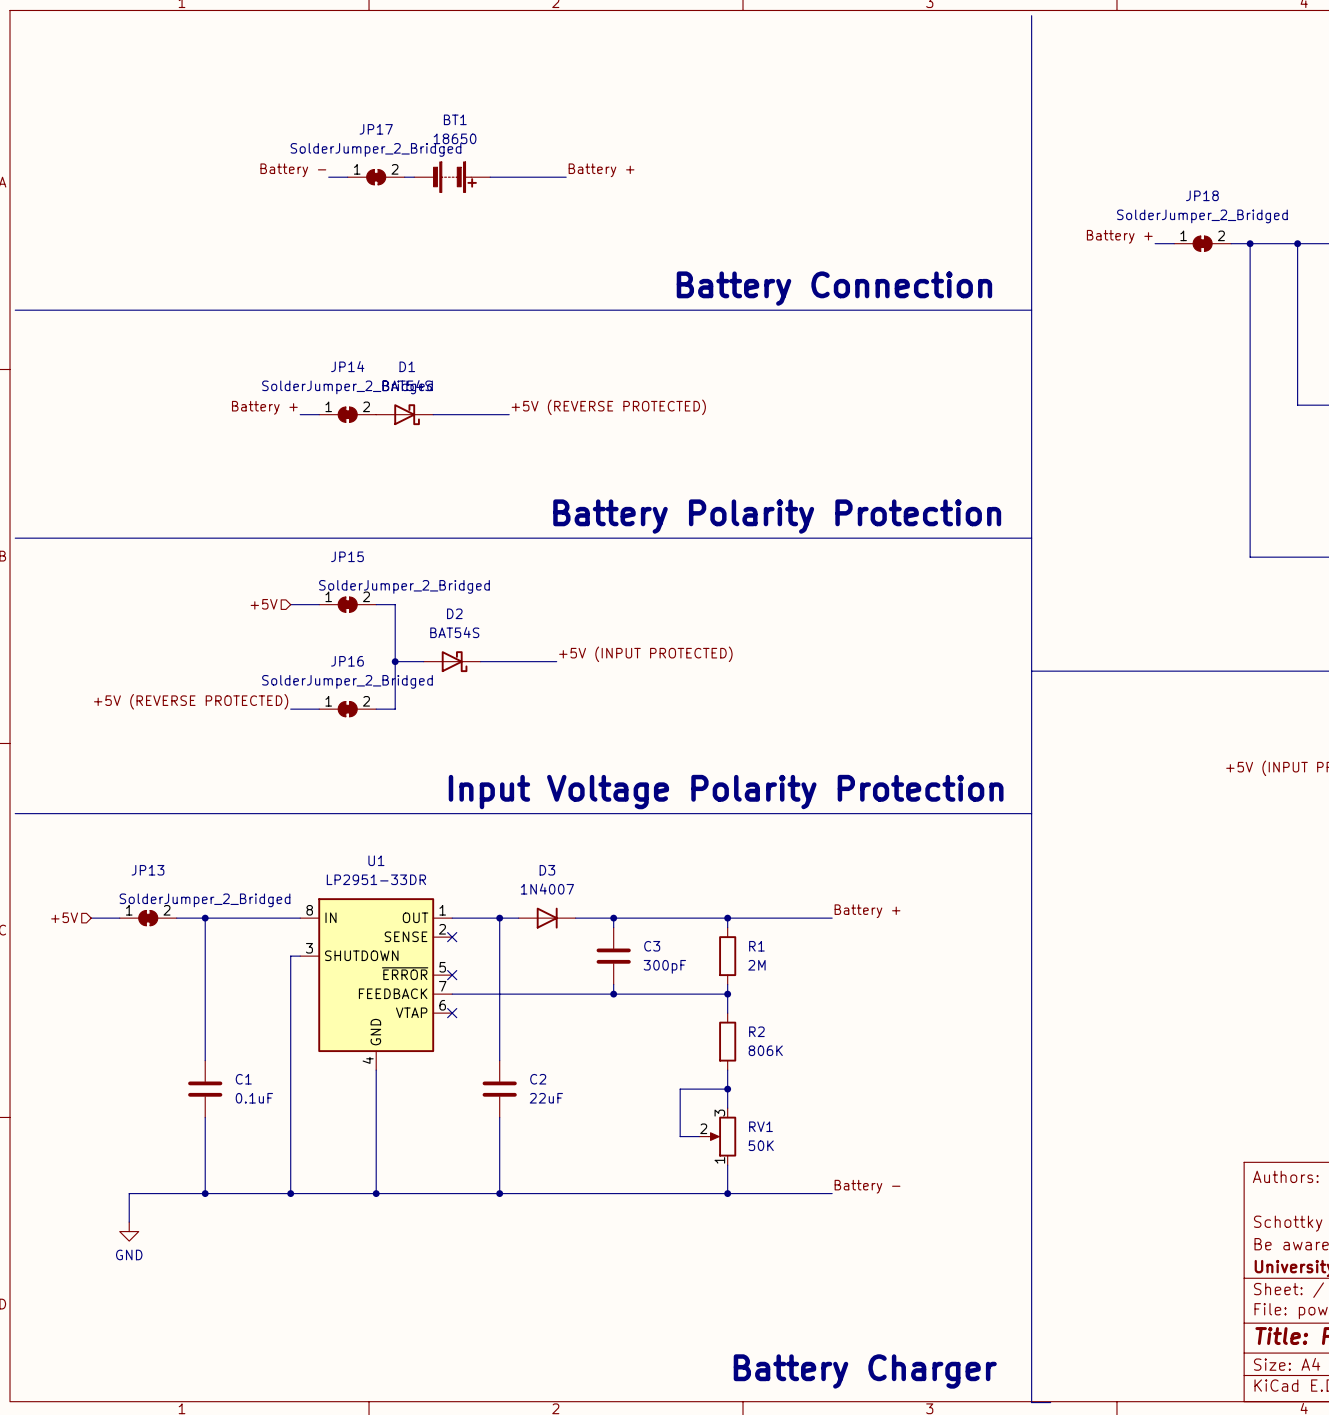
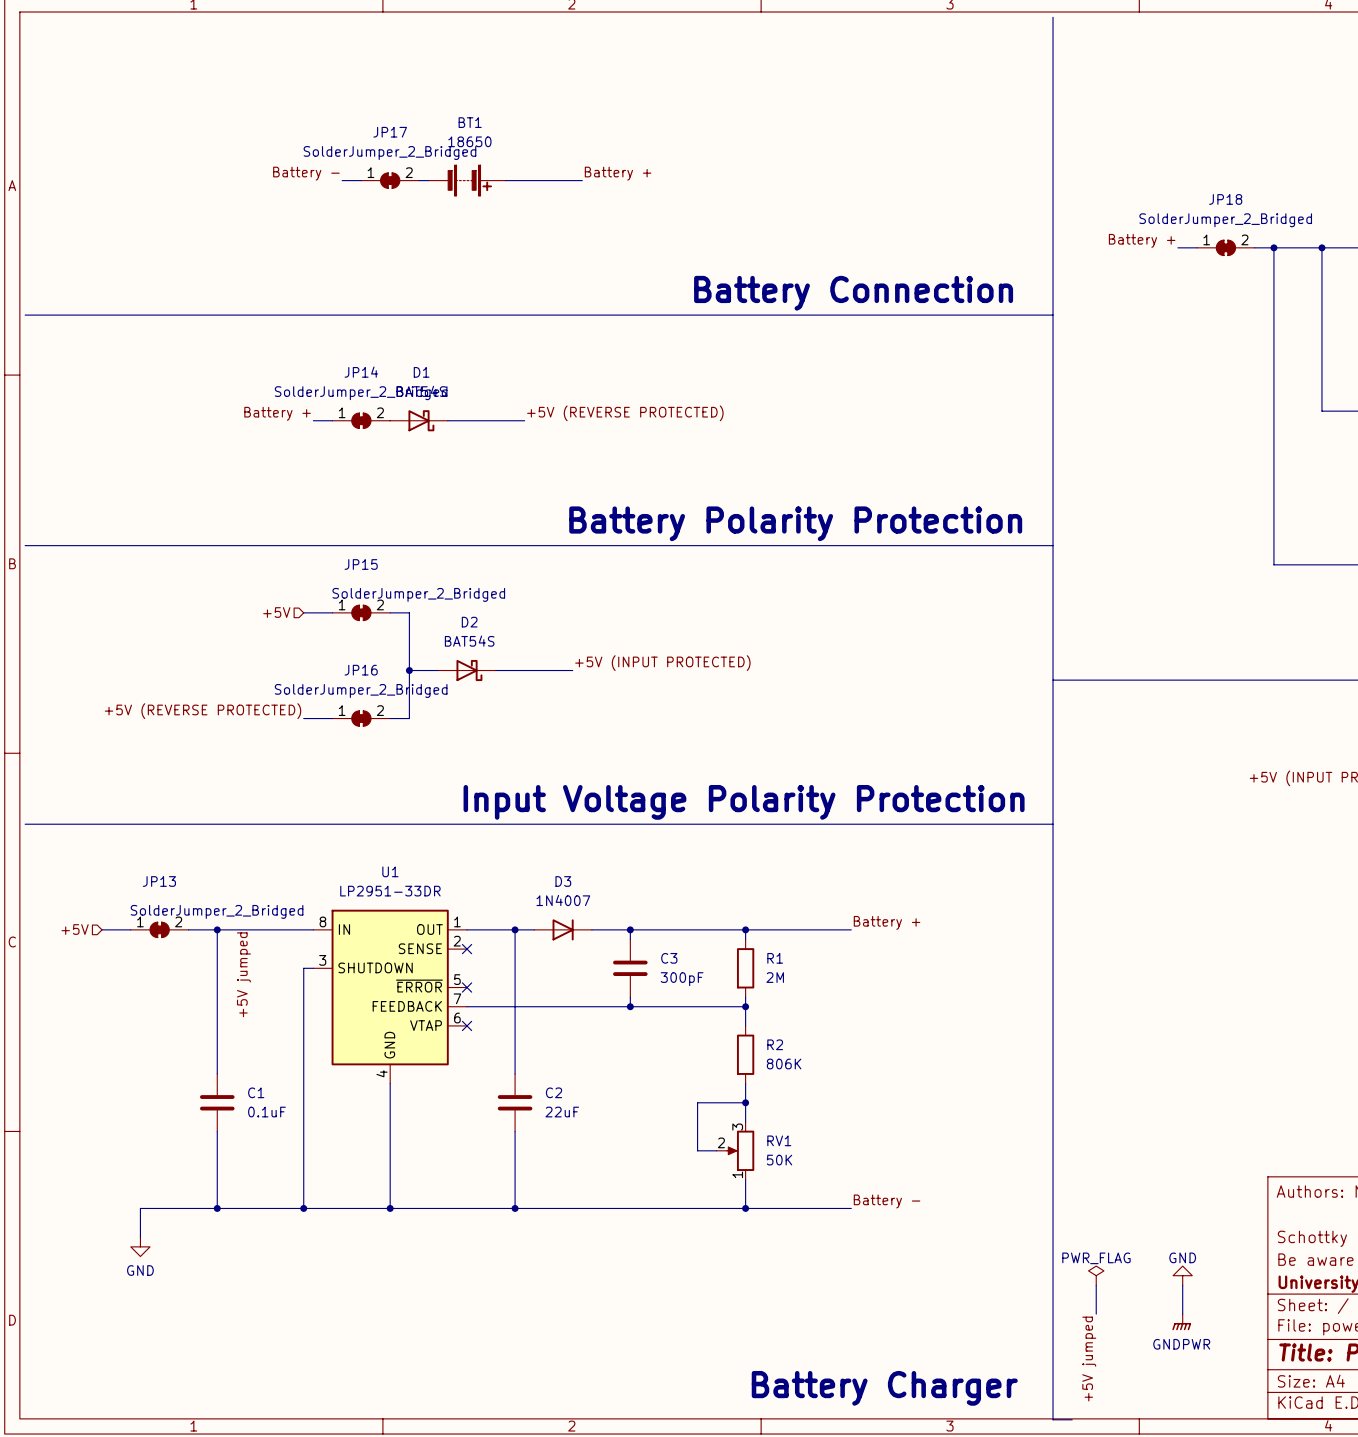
label: none -> +5V jumped (243, 974)
power symbol: none -> PWR_FLAG (1096, 1275)
power symbol: none -> GND (1182, 1275)
wire: none -> (1096, 1285) (1096, 1314)
wire: none -> (1182, 1285) (1182, 1314)
power symbol: none -> GNDPWR (1181, 1322)
label: none -> +5V jumped (1089, 1359)

